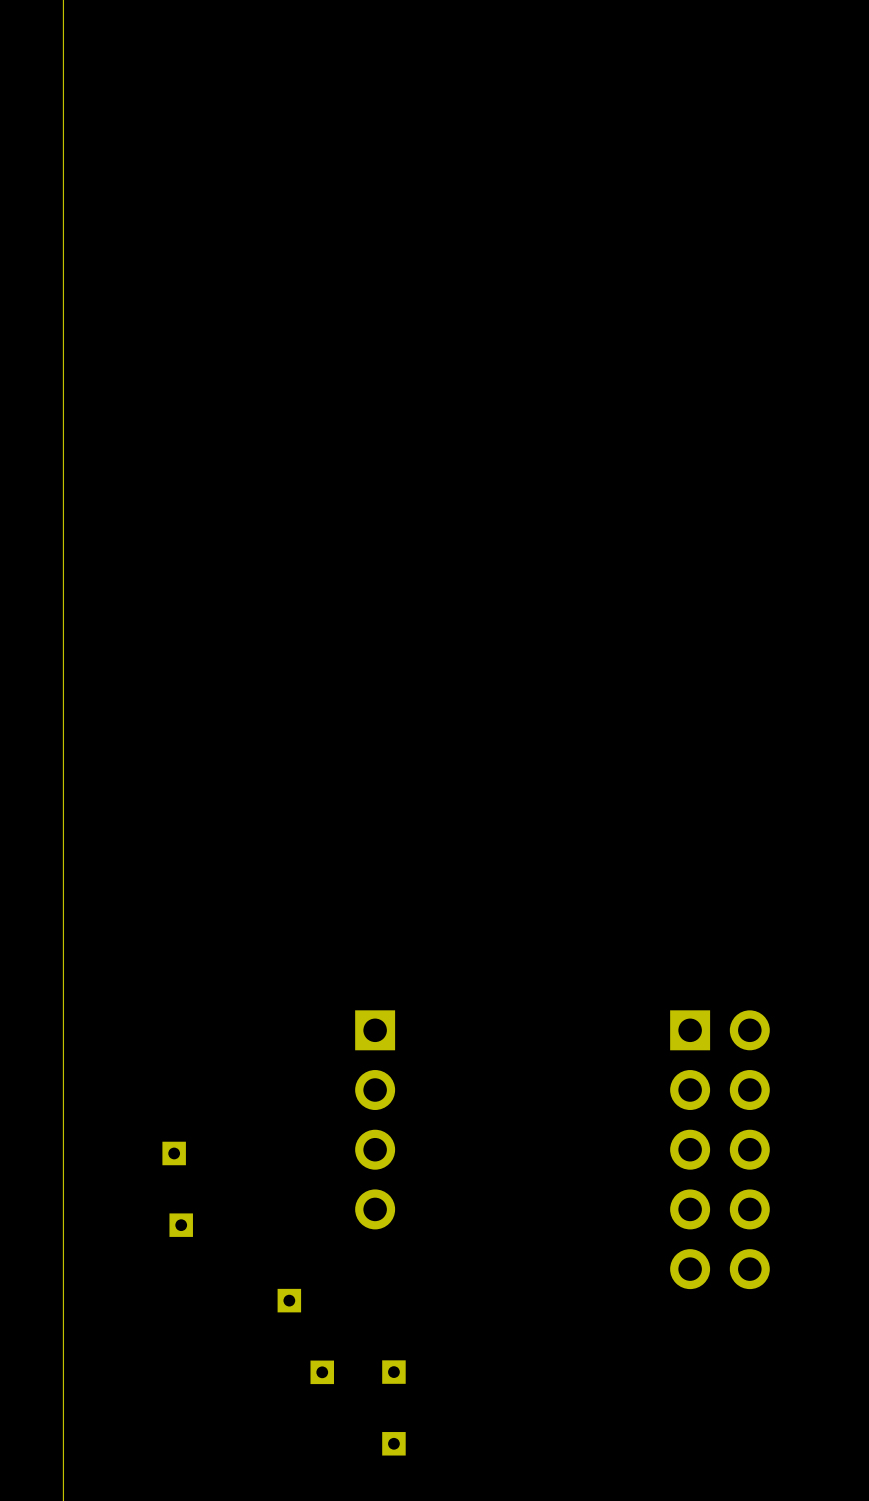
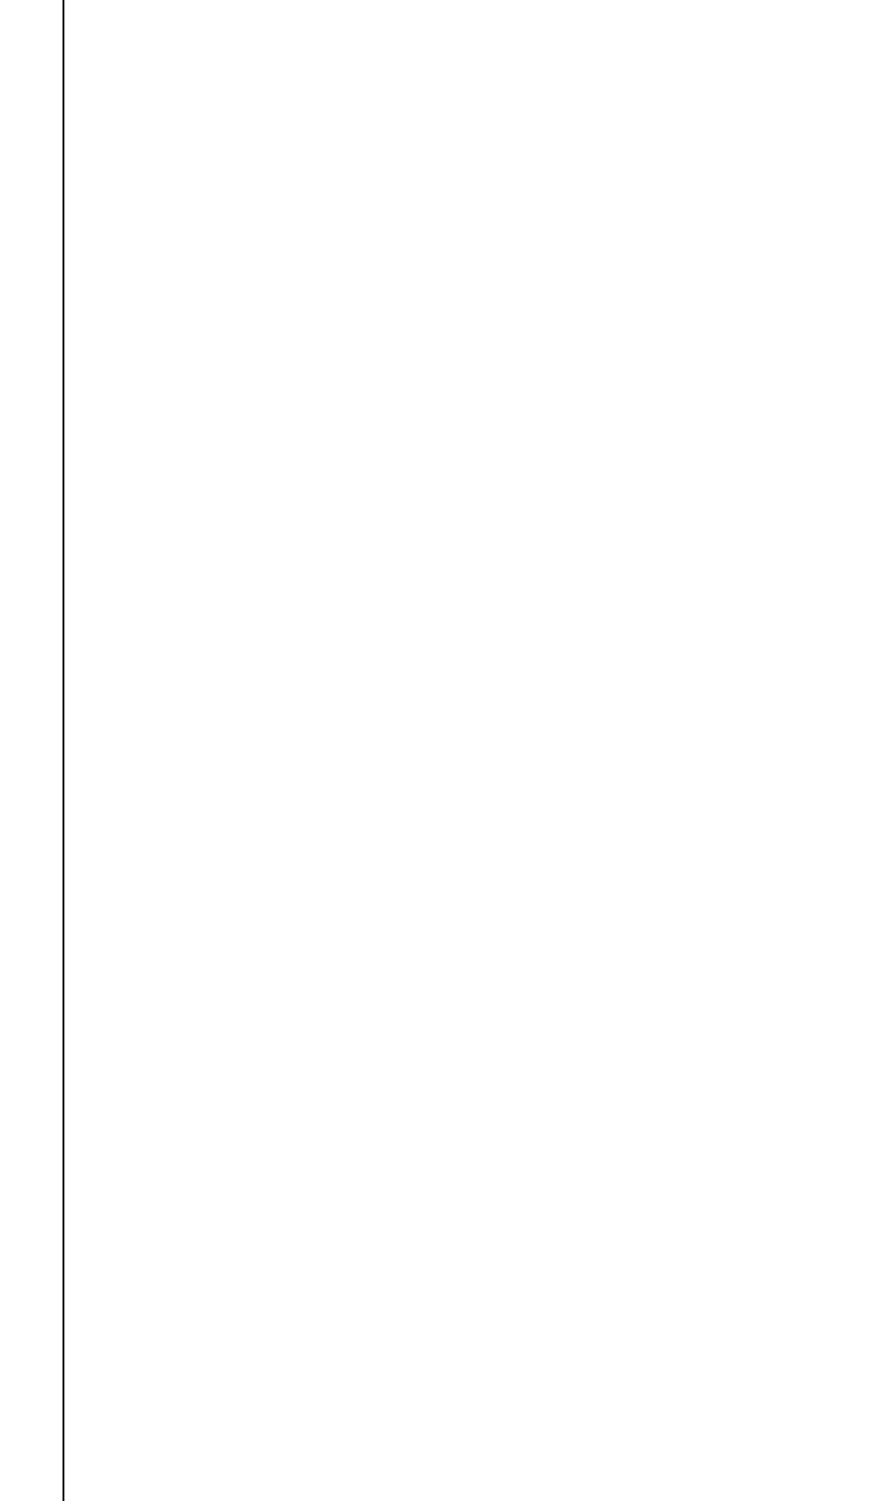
part: (375, 1119) -> none
part: (719, 1149) -> none
part: (174, 1153) -> none
part: (181, 1225) -> none
part: (289, 1300) -> none
part: (322, 1372) -> none
part: (393, 1372) -> none
part: (393, 1443) -> none

